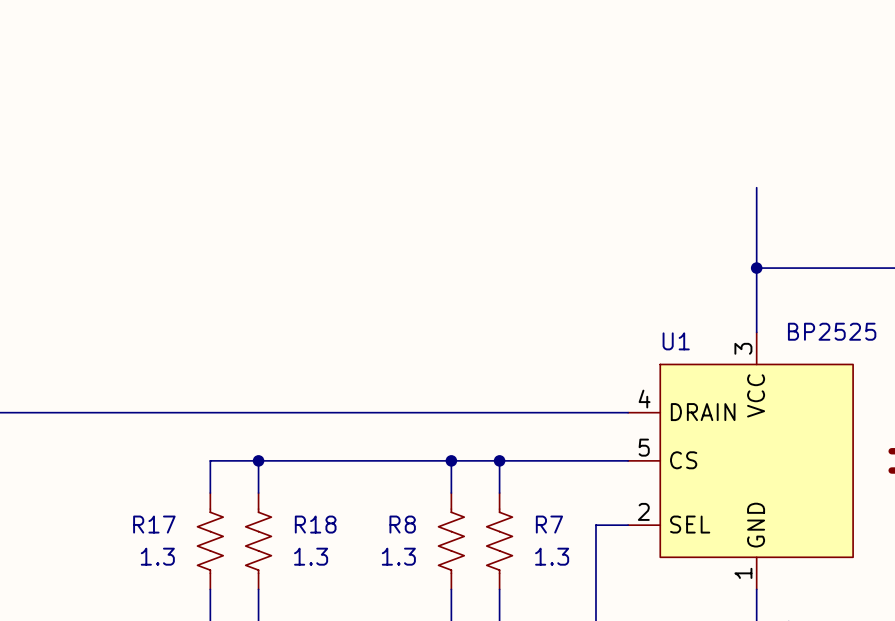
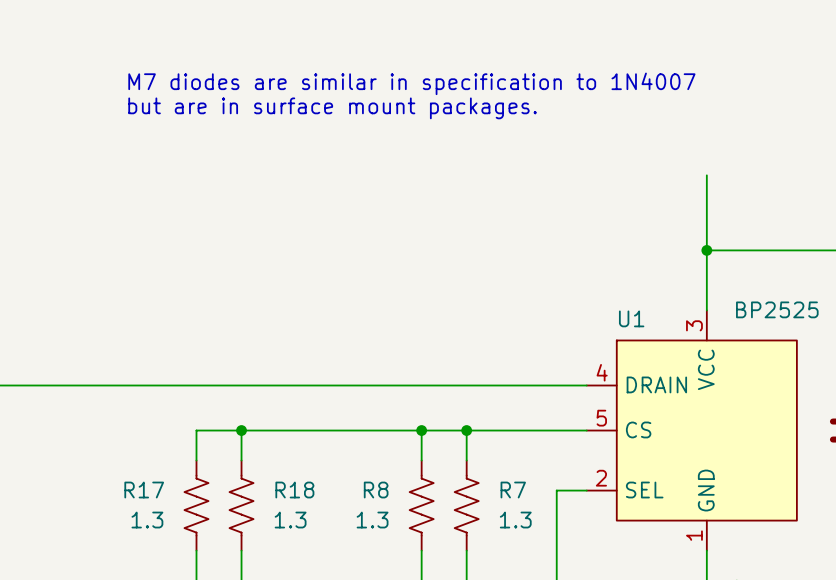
text: none -> M7 diodes are similar in specification to 1N4007 (411, 83)
text: none -> but are in surface mount packages. (332, 108)

